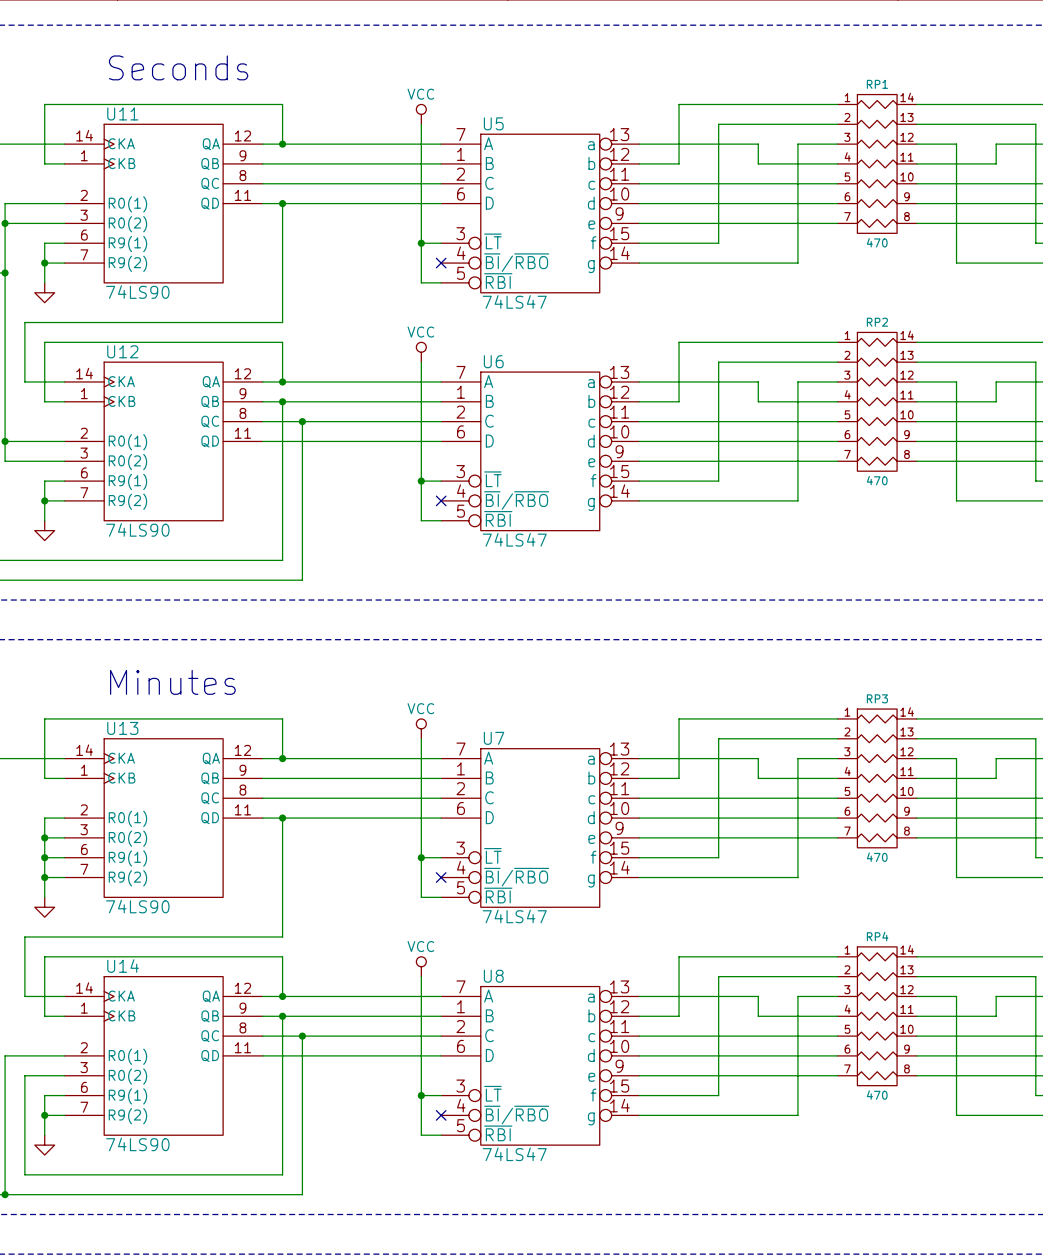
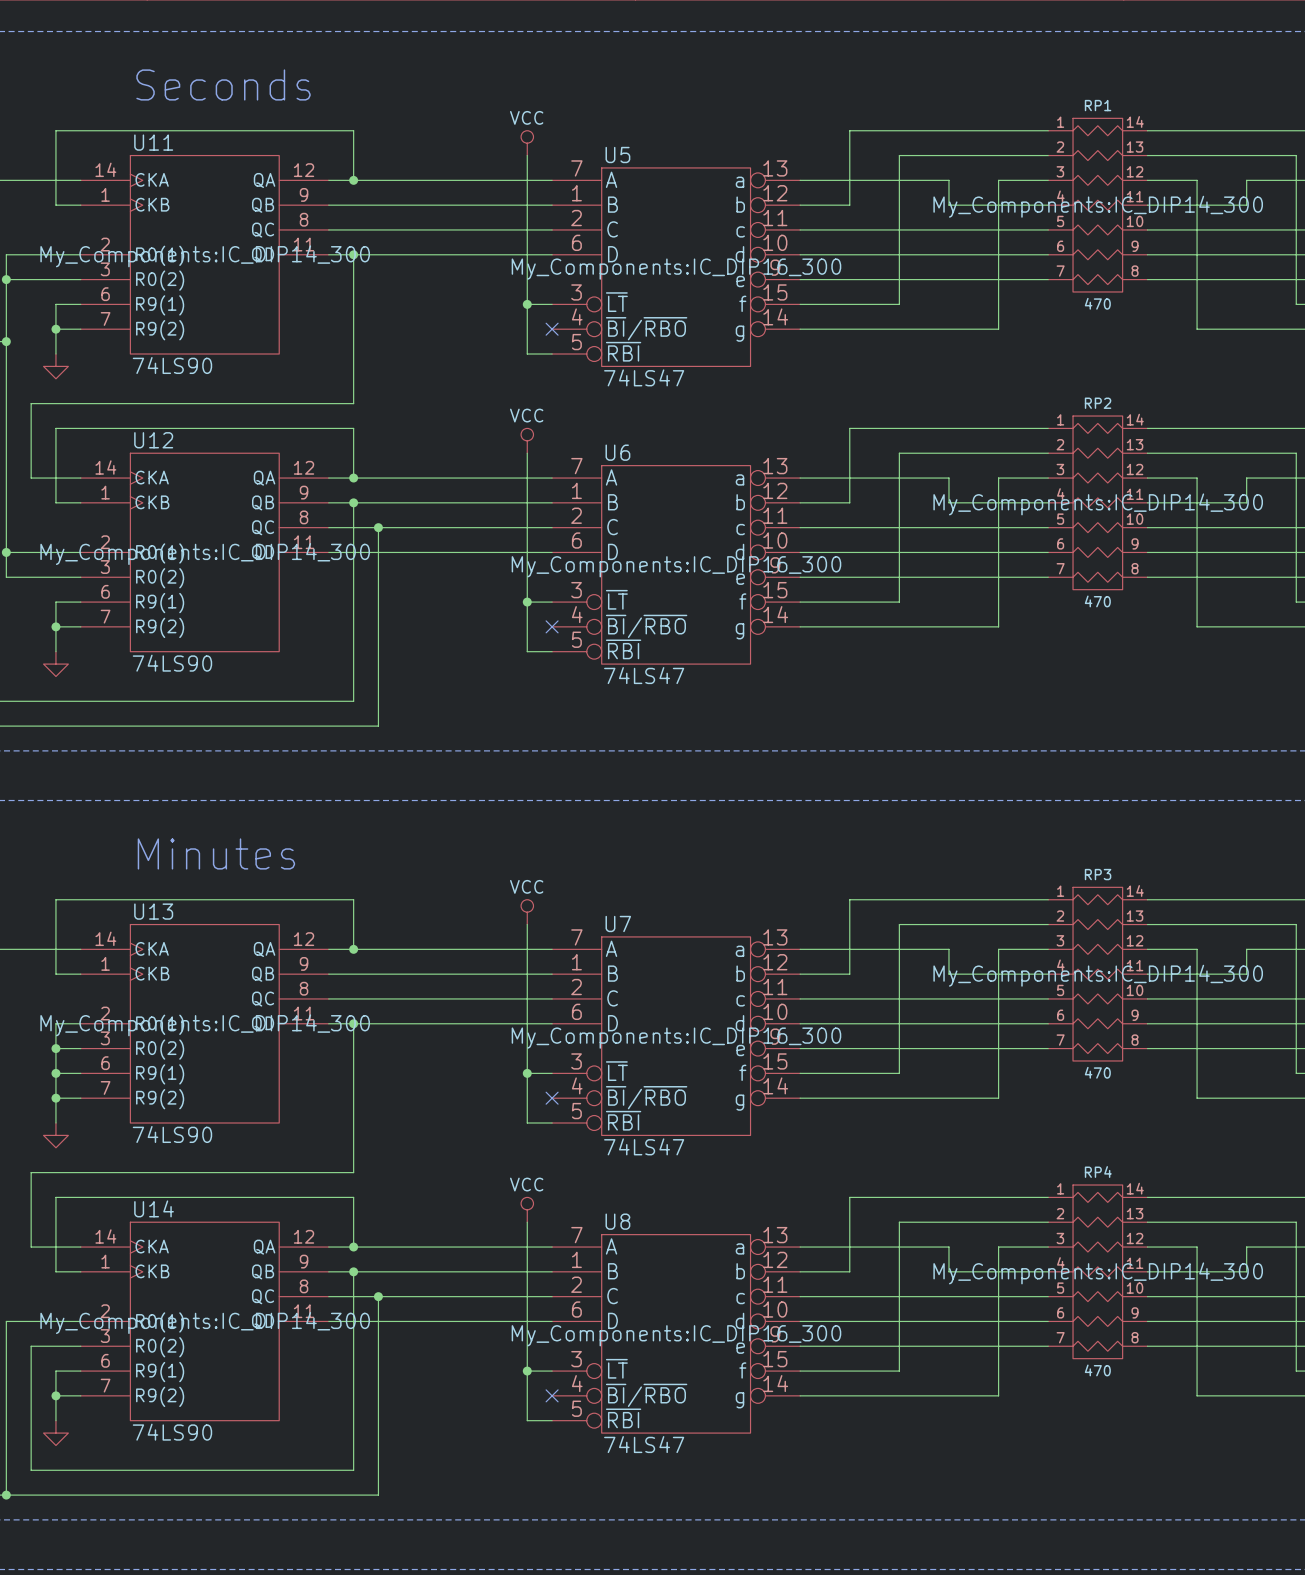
RP1 text: none -> My_Components:IC_DIP14_300 (1098, 206)
U11 text: none -> My_Components:IC_DIP14_300 (205, 256)
U5 text: none -> My_Components:IC_DIP16_300 (676, 269)
RP2 text: none -> My_Components:IC_DIP14_300 (1098, 504)
U12 text: none -> My_Components:IC_DIP14_300 (205, 554)
U6 text: none -> My_Components:IC_DIP16_300 (676, 566)
RP3 text: none -> My_Components:IC_DIP14_300 (1098, 975)
U13 text: none -> My_Components:IC_DIP14_300 (205, 1025)
U7 text: none -> My_Components:IC_DIP16_300 (676, 1038)
RP4 text: none -> My_Components:IC_DIP14_300 (1098, 1273)
U14 text: none -> My_Components:IC_DIP14_300 (205, 1323)
U8 text: none -> My_Components:IC_DIP16_300 (676, 1335)

